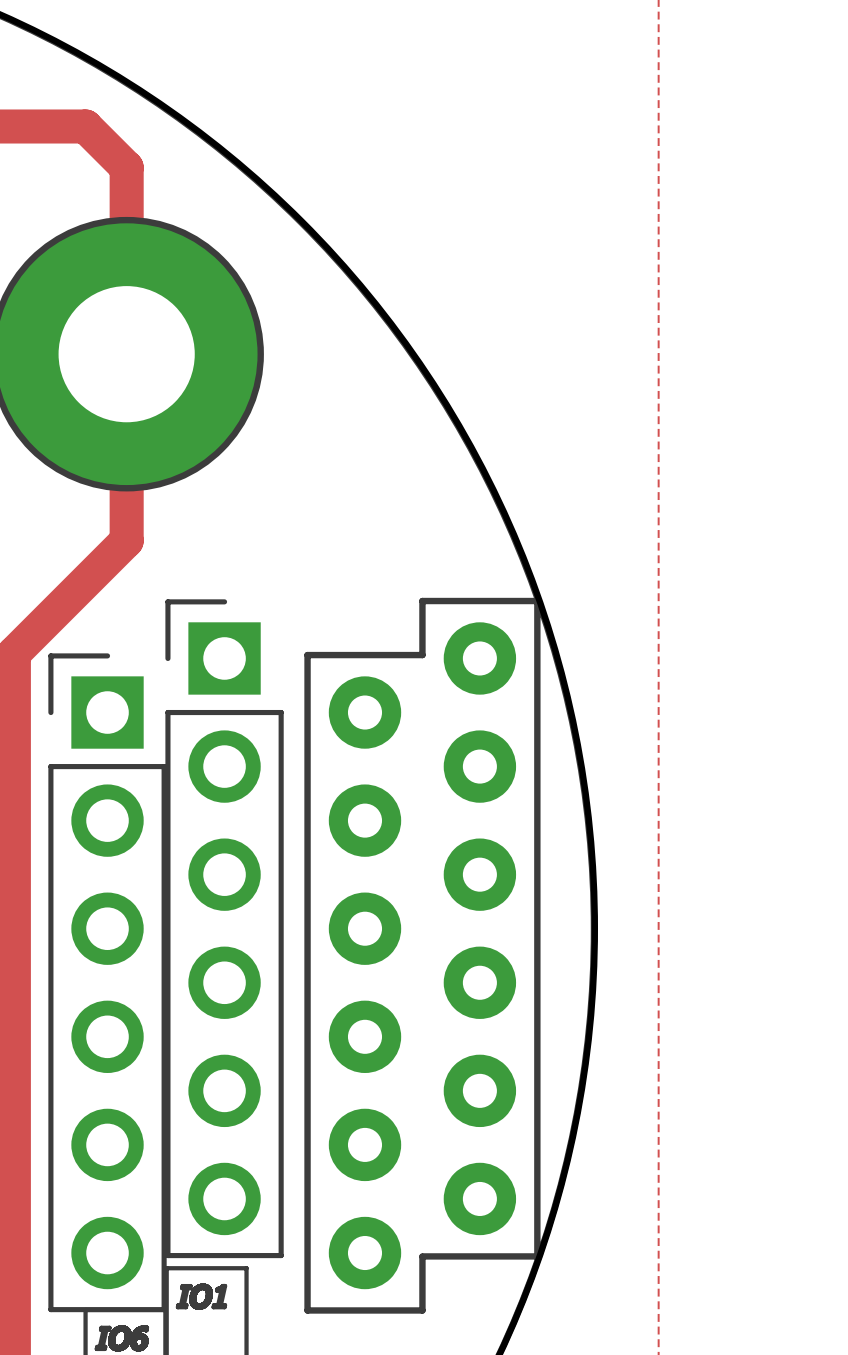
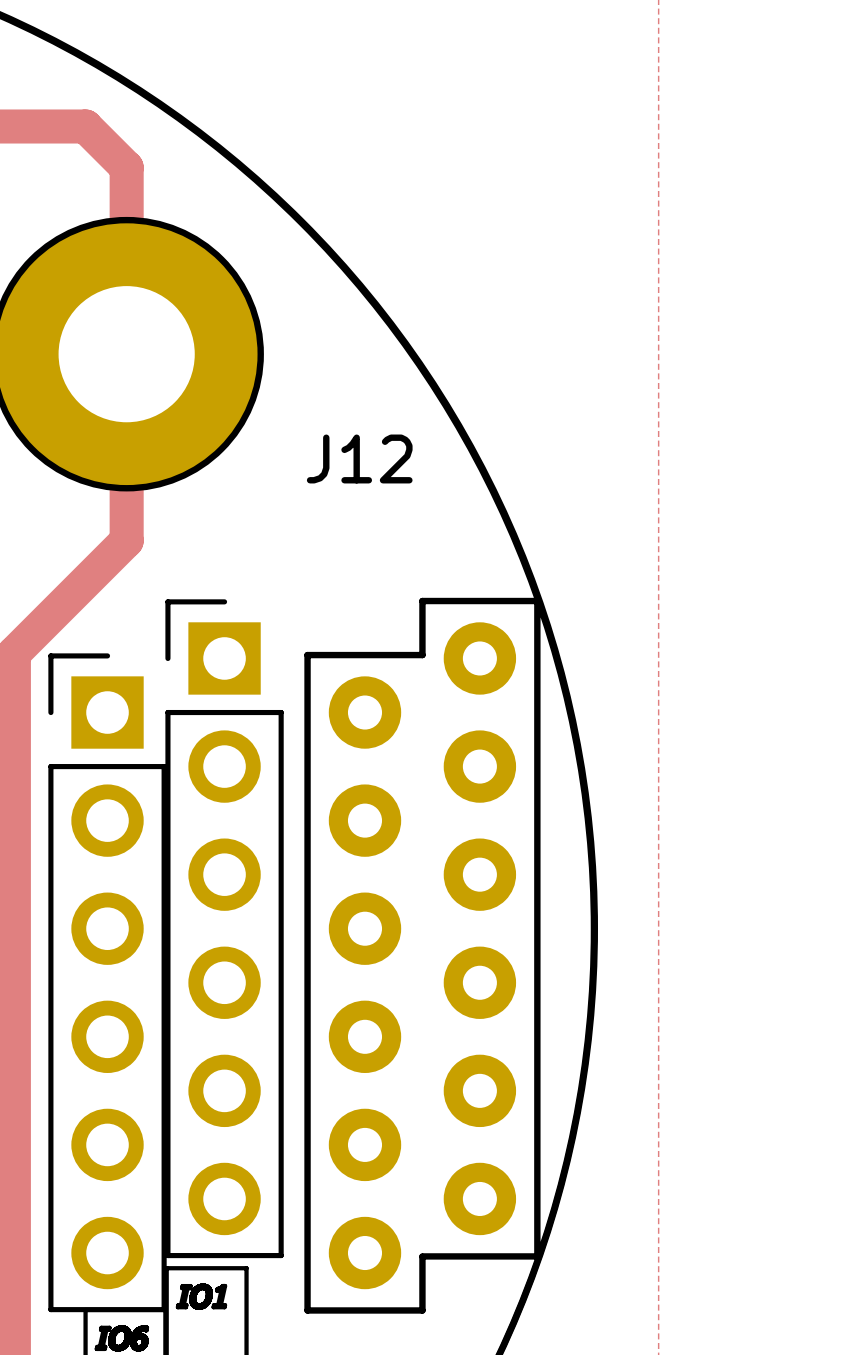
J12 name: none -> J12 (359, 458)

